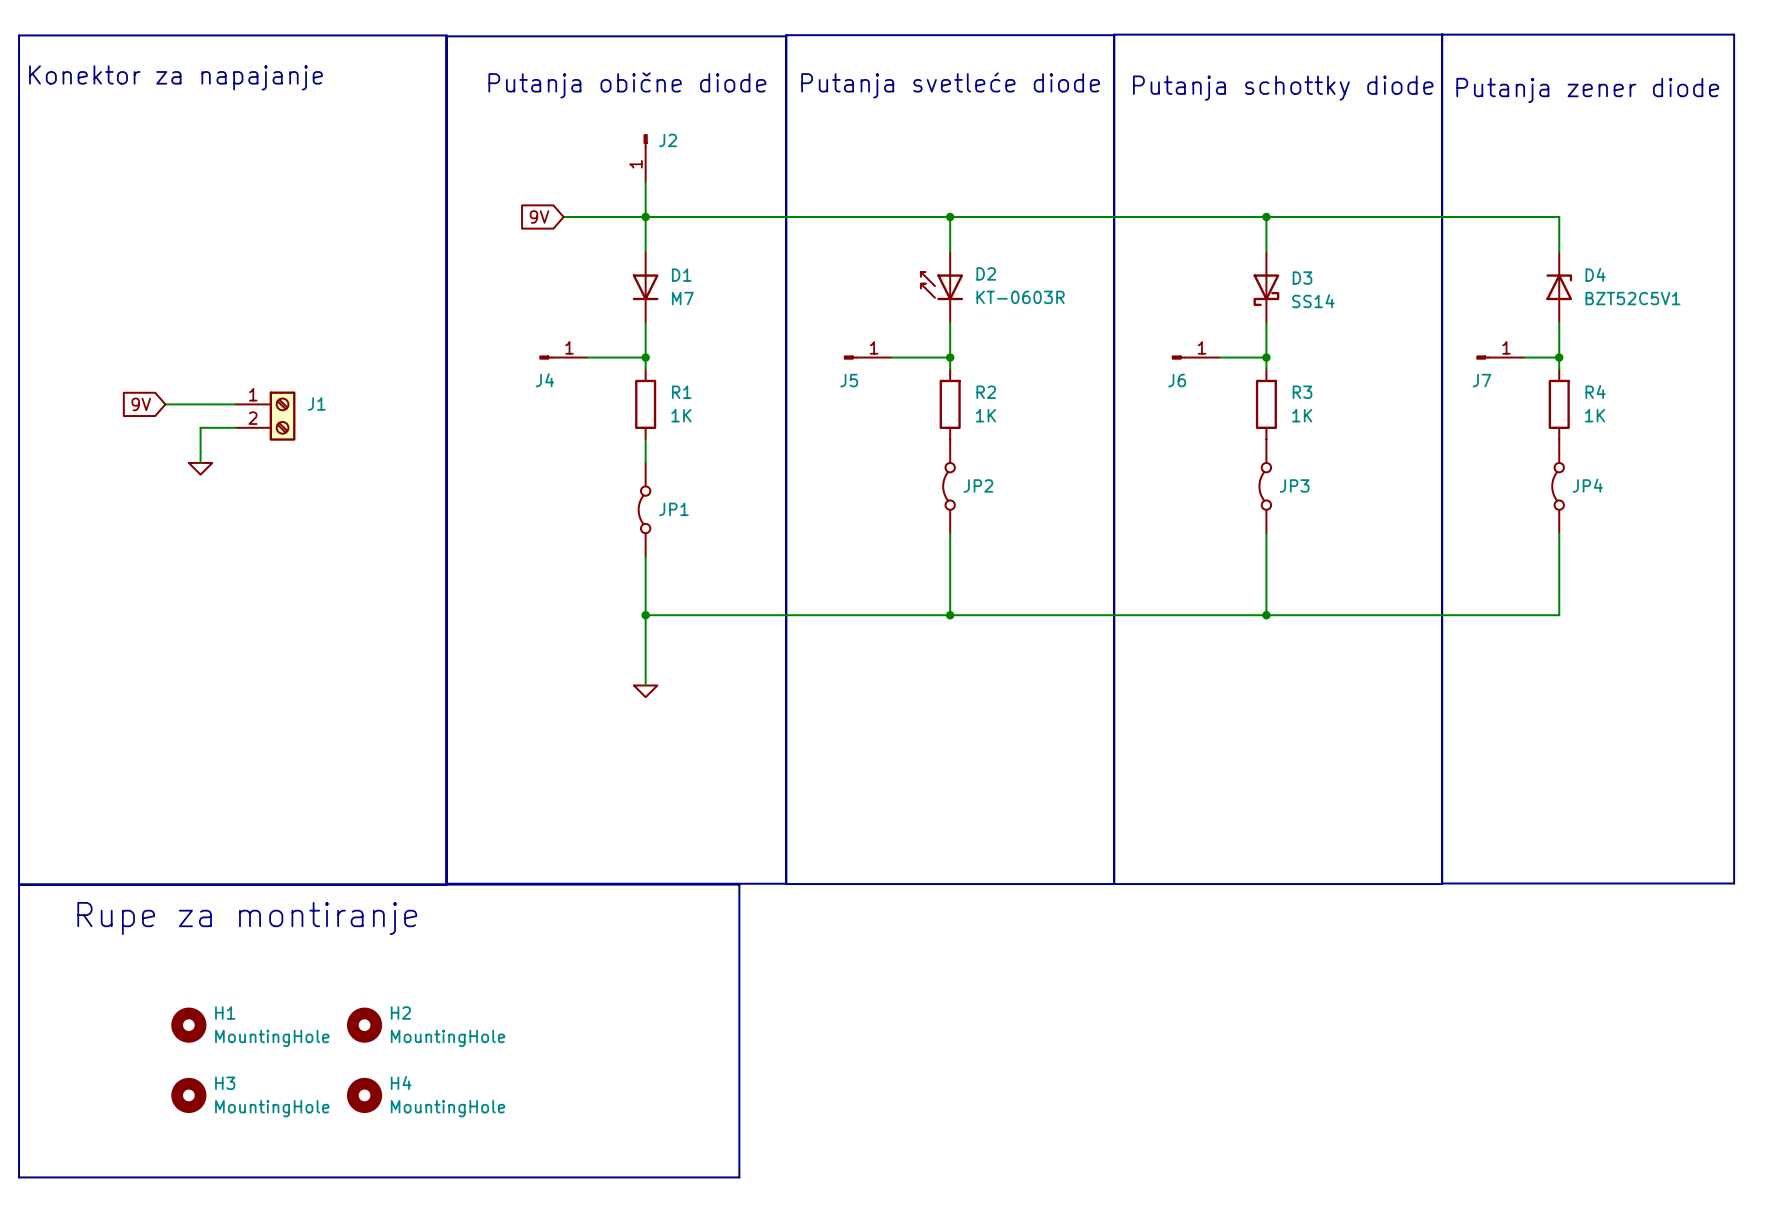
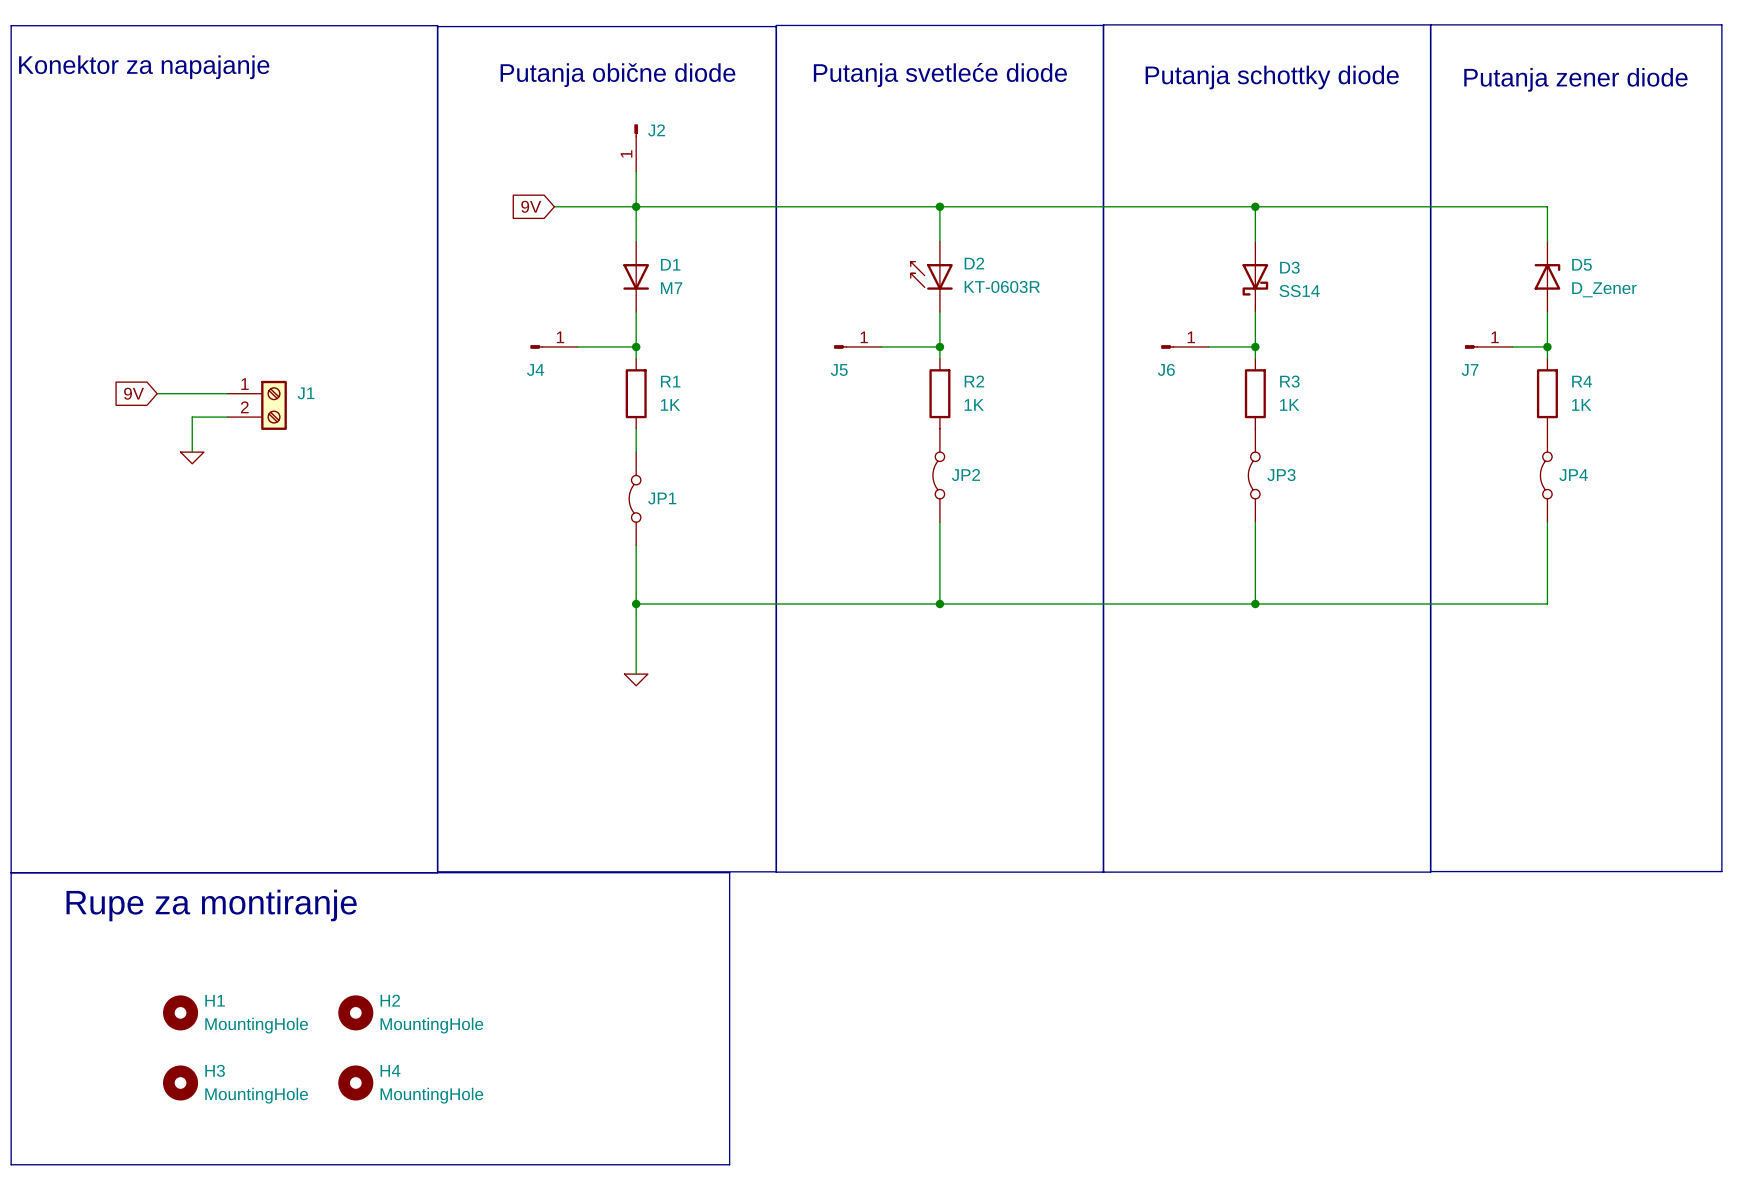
D4 name: D4 (1595, 274) -> D5 (1581, 264)
D4 value: BZT52C5V1 (1632, 298) -> D_Zener (1604, 289)

